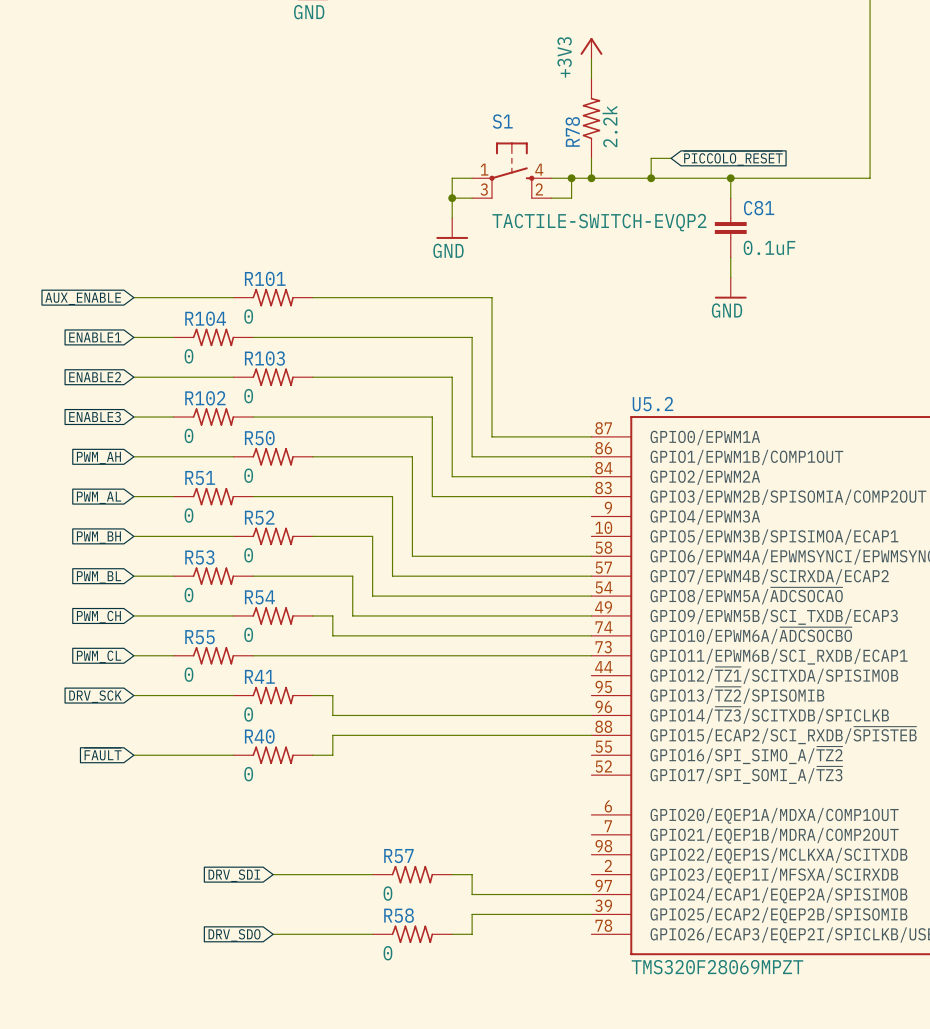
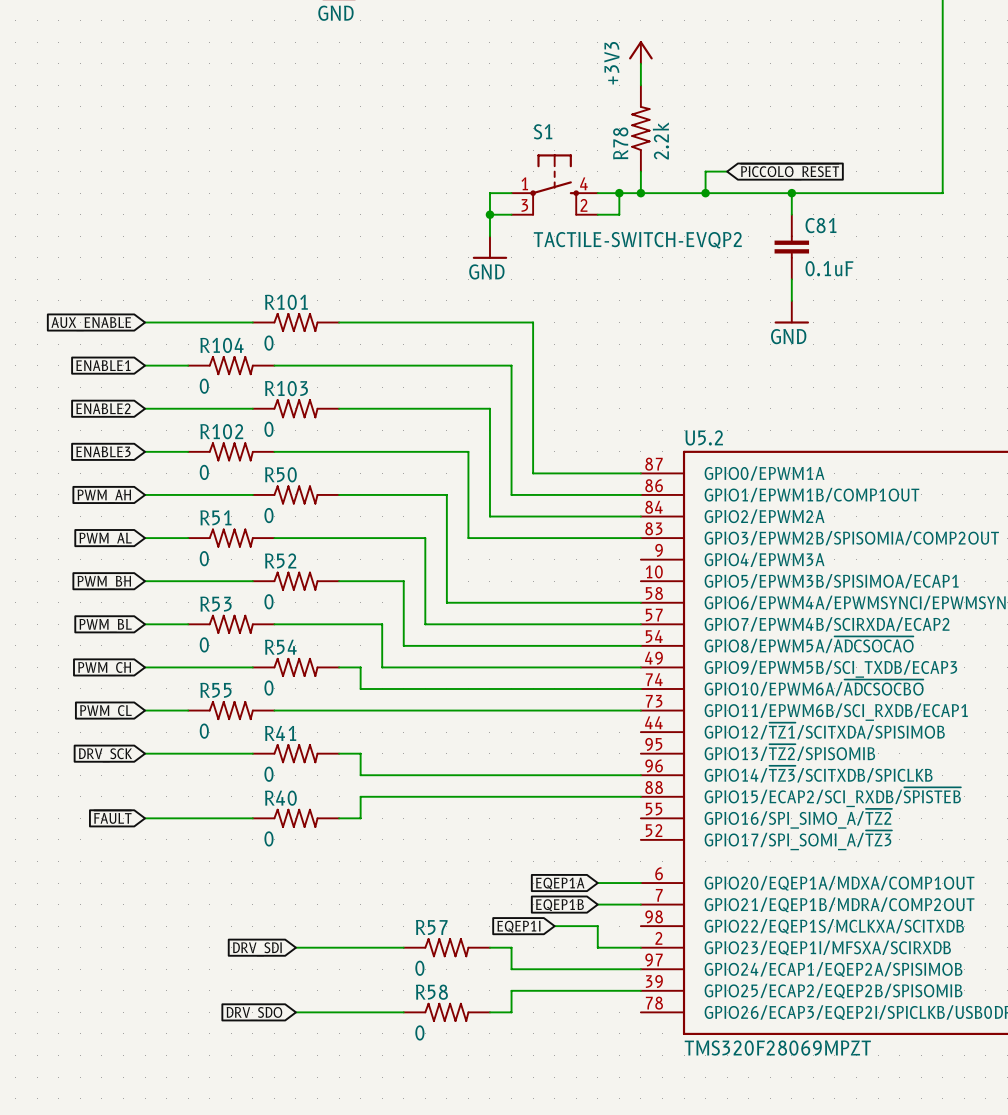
wire: none -> (597, 883) (640, 883)
global label: none -> EQEP1A (560, 883)
wire: none -> (597, 904) (640, 904)
global label: none -> EQEP1B (559, 905)
wire: none -> (554, 926) (597, 926) (597, 947) (640, 947)
global label: none -> EQEP1I (518, 926)

